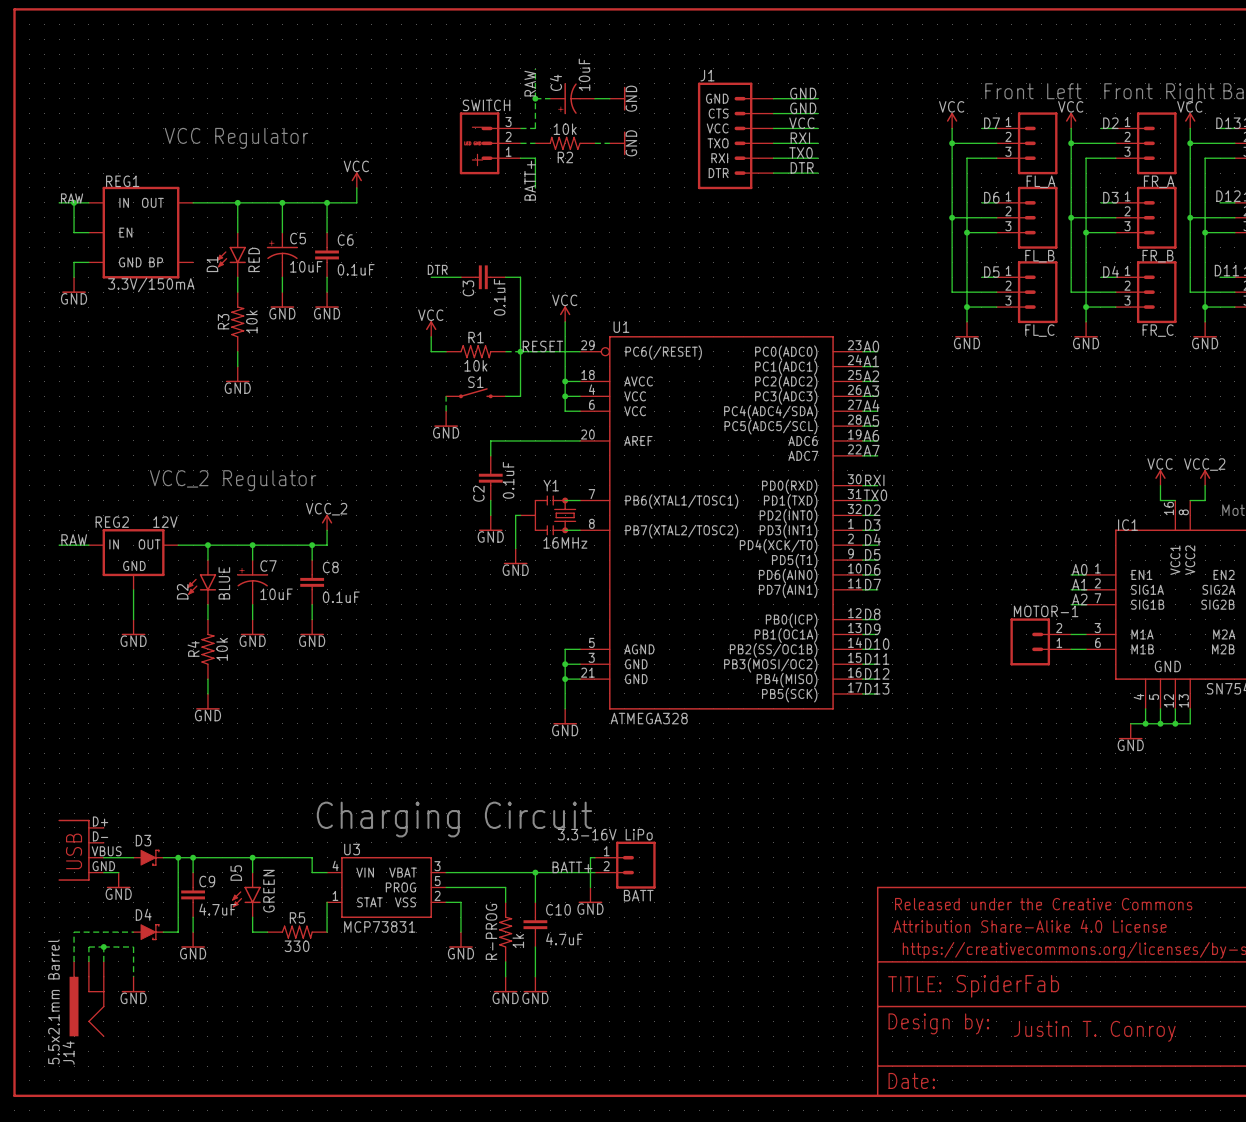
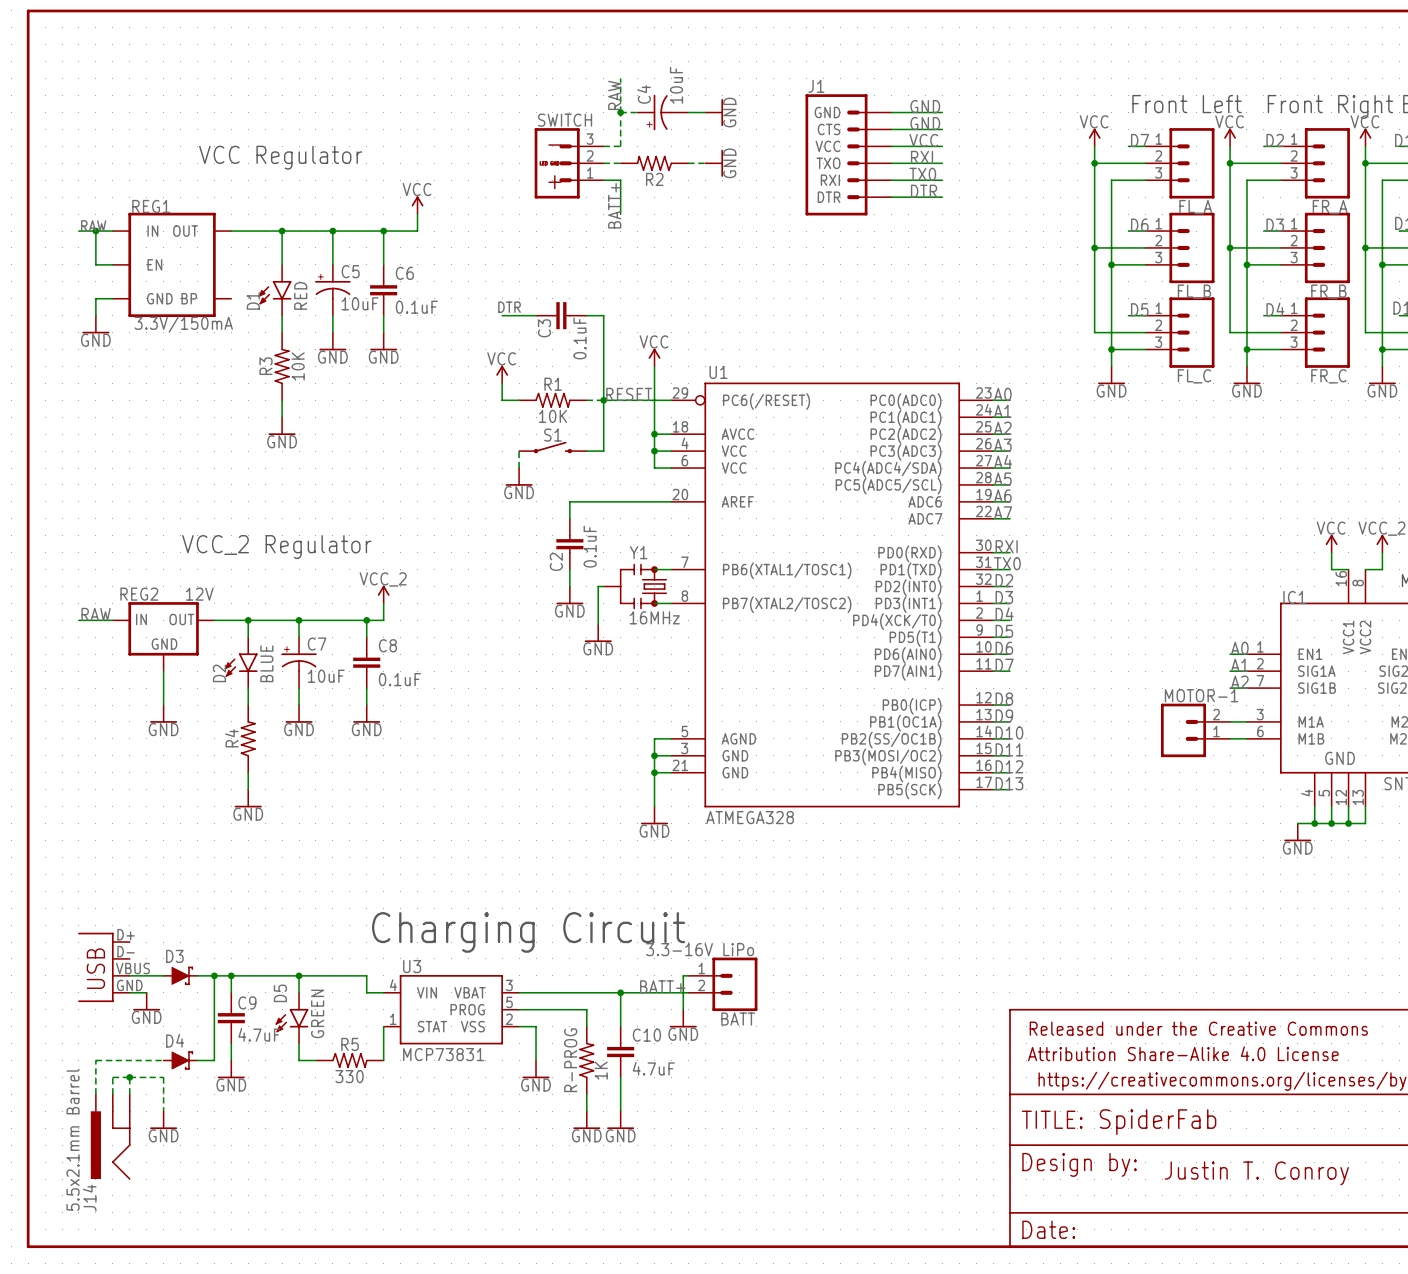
R2 value: 10k (565, 129) -> none
R3 value: 10k (251, 321) -> 10K (298, 366)
R1 value: 10k (475, 365) -> 10K (552, 416)
R4 value: 10k (222, 649) -> none
R-PROG value: 1k (518, 941) -> 1K (601, 1070)

